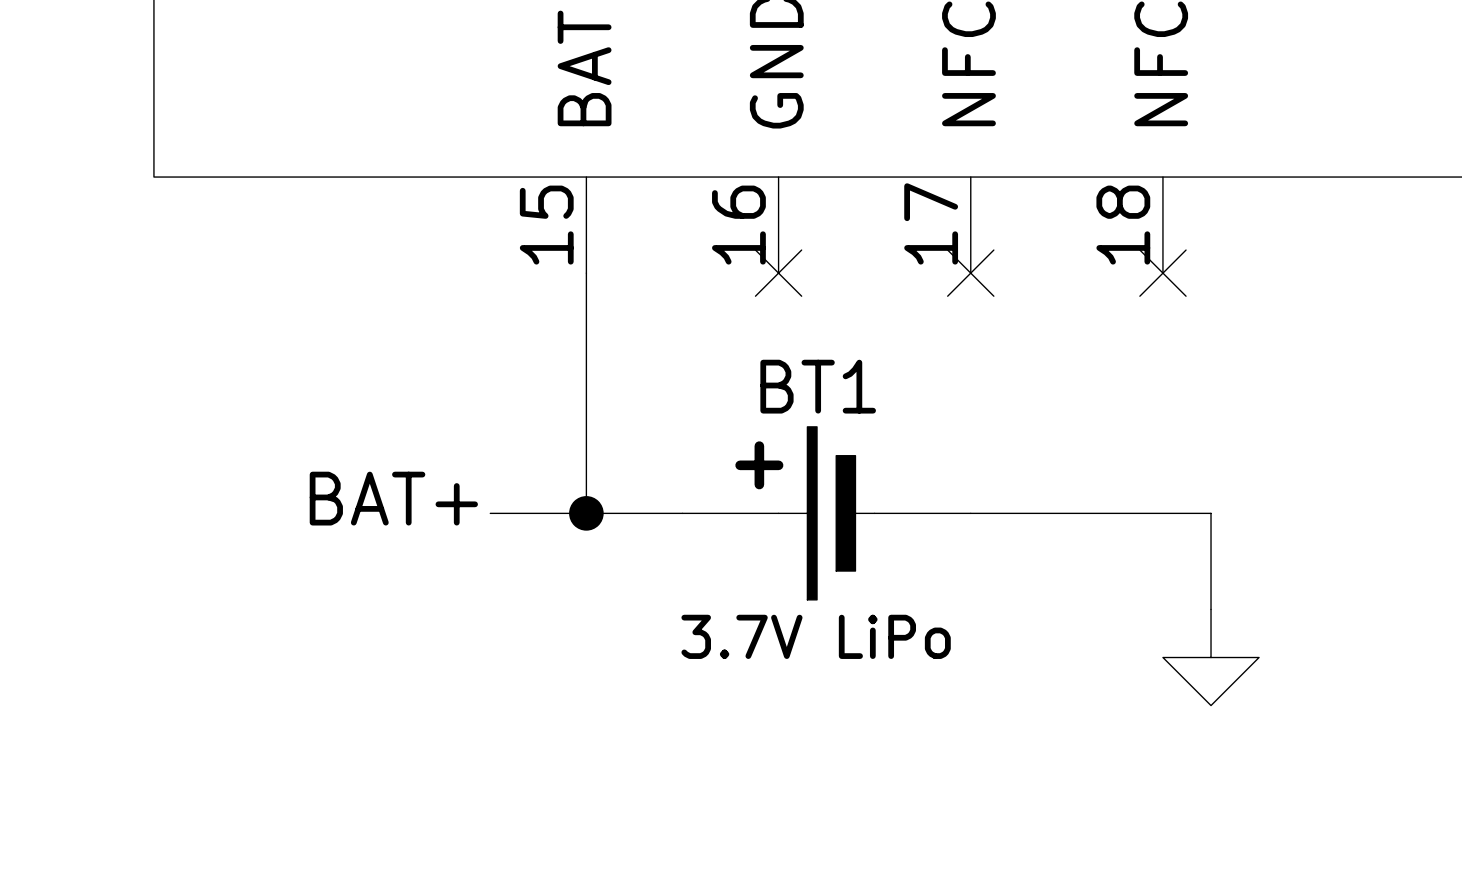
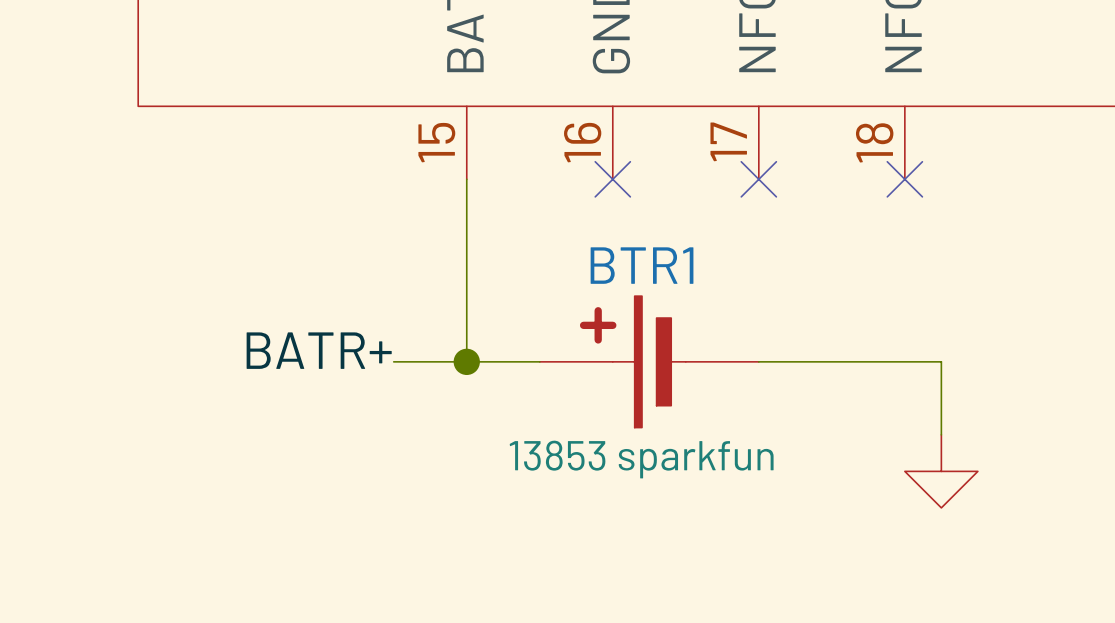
BT1 name: BT1 (818, 386) -> BTR1 (642, 265)
label: BAT+ (393, 498) -> BATR+ (319, 350)
BT1 value: 3.7V LiPo (816, 636) -> 13853 sparkfun (641, 459)

